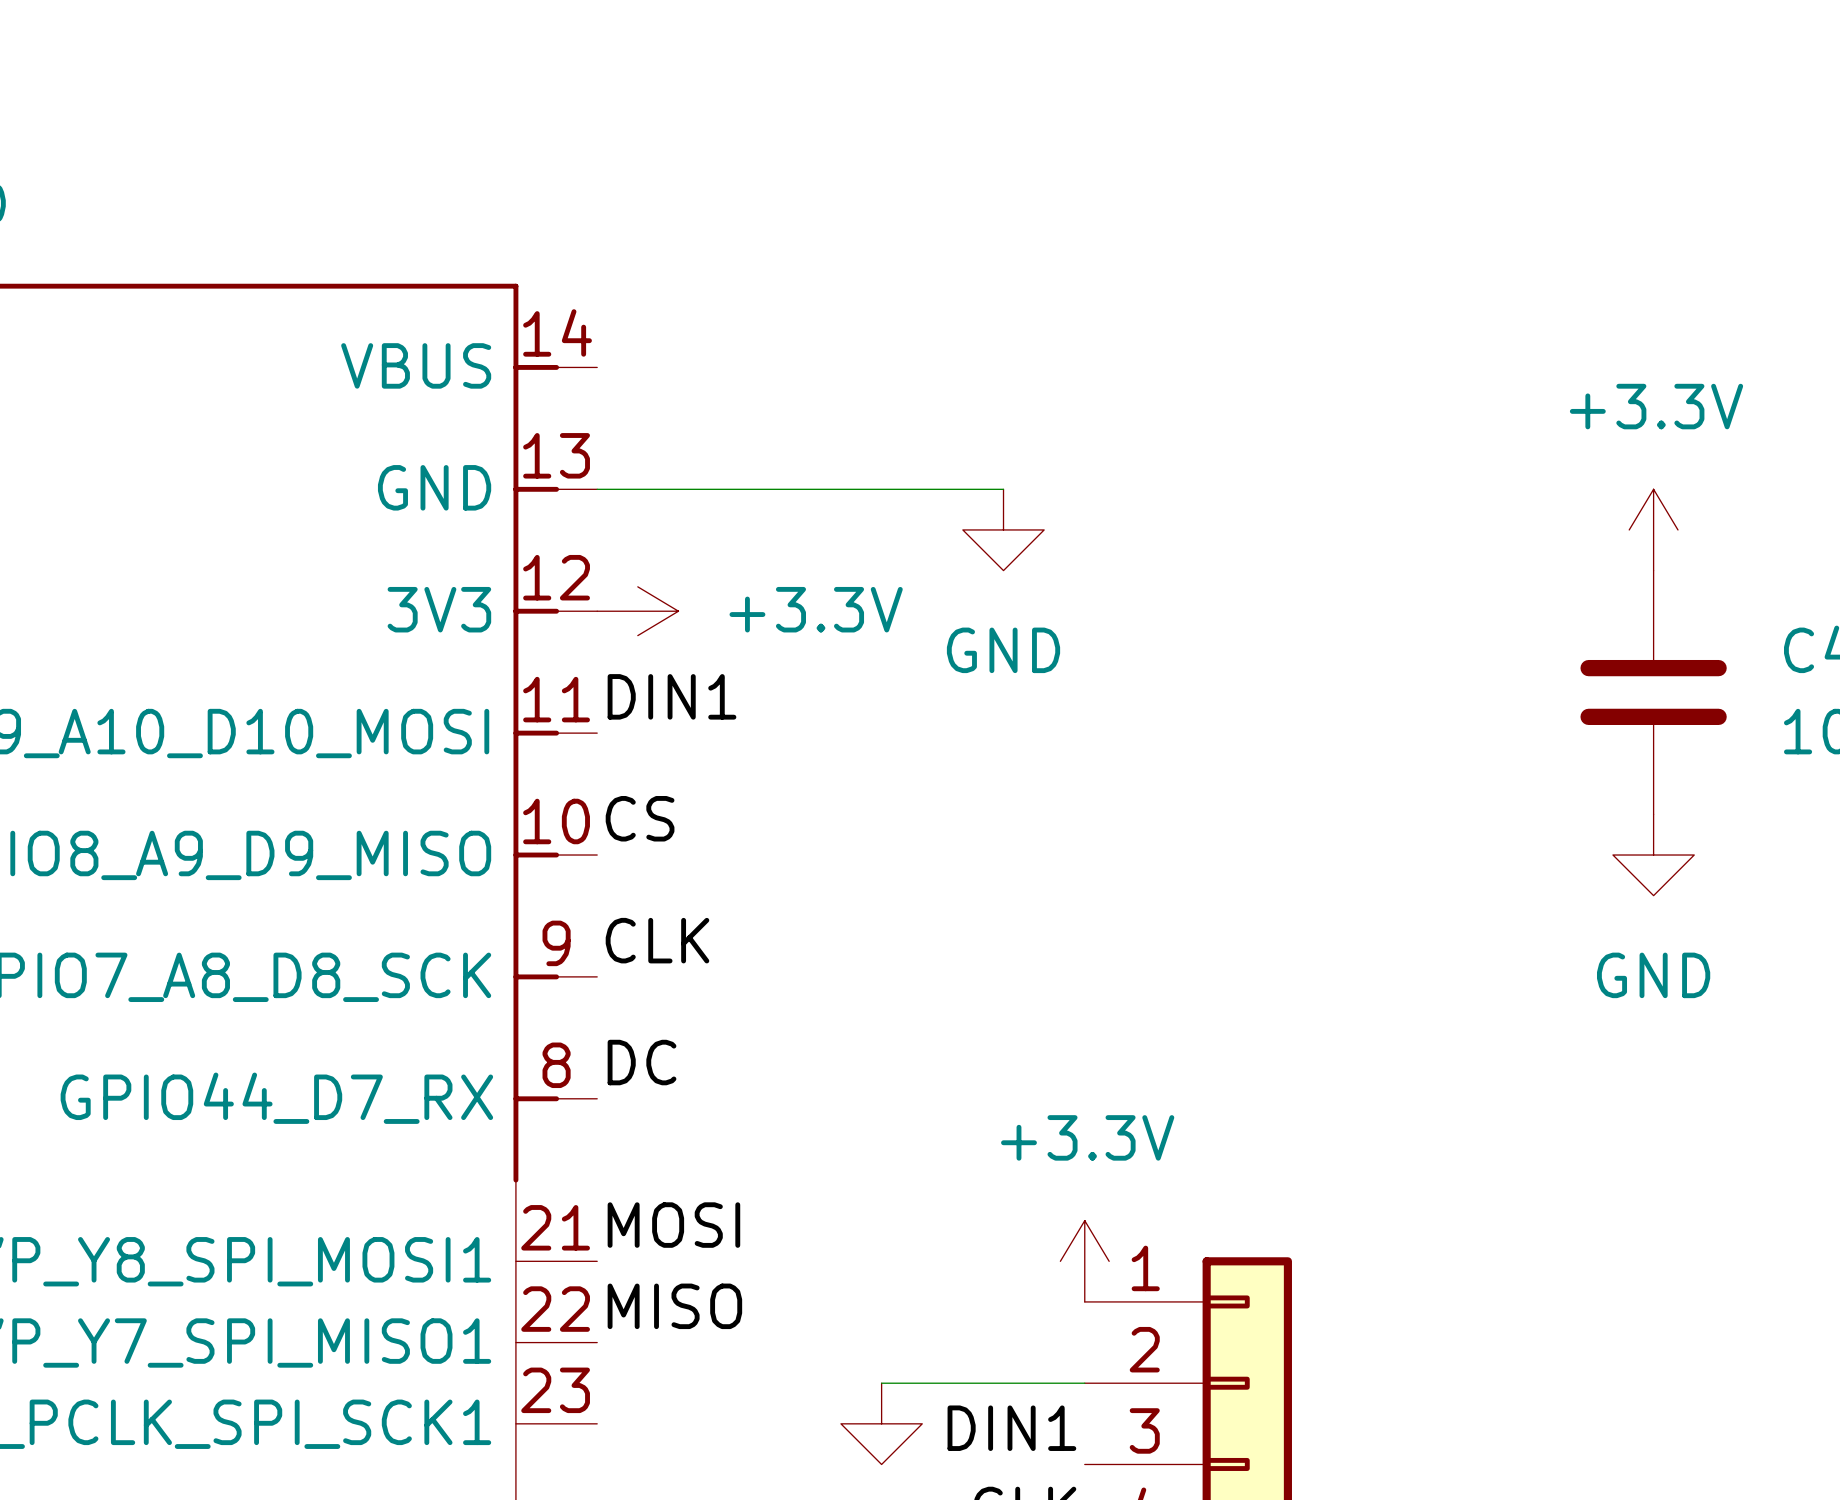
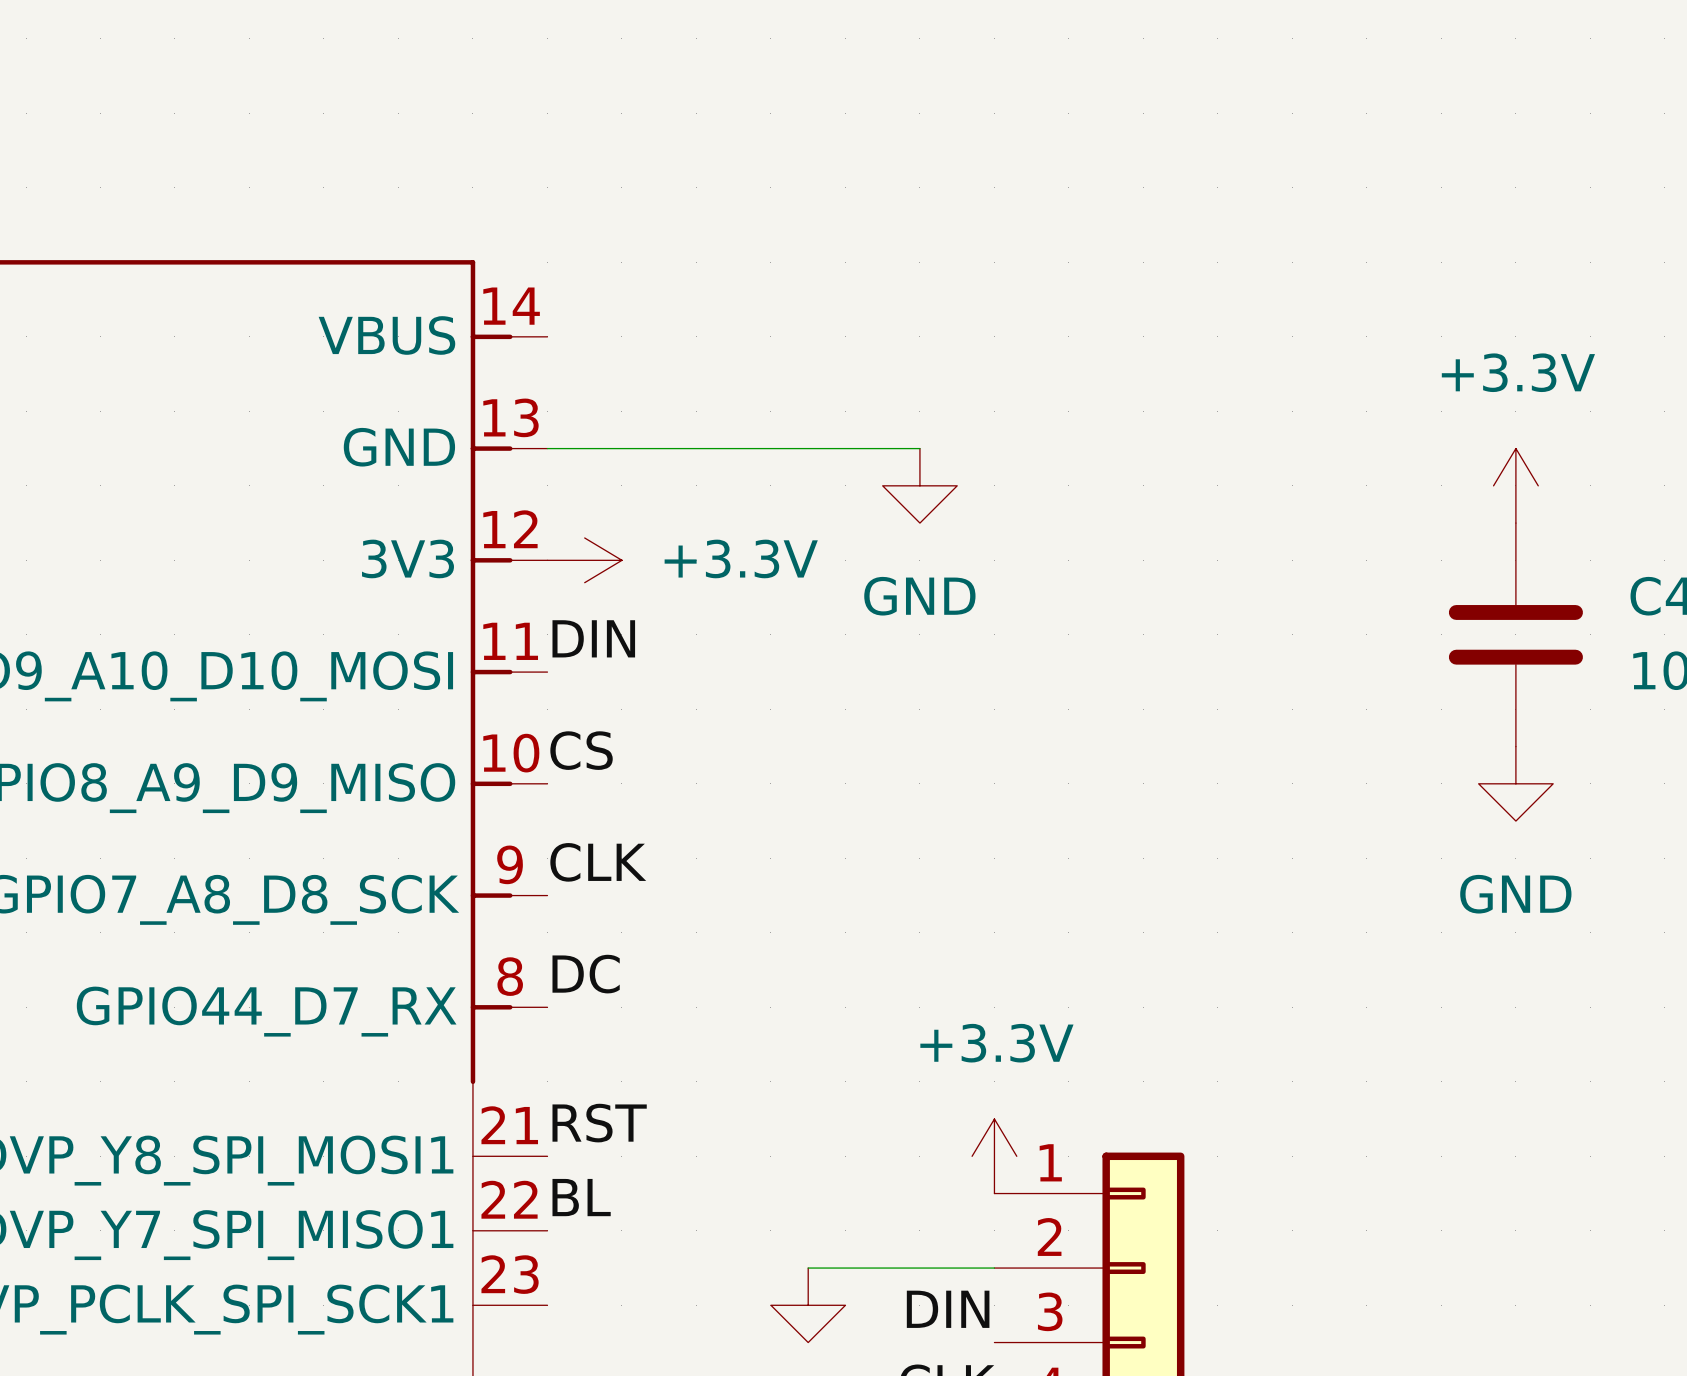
label: DIN1 (671, 696) -> DIN (593, 638)
label: MOSI (673, 1225) -> RST (599, 1123)
label: MISO (674, 1306) -> BL (581, 1197)
label: DIN1 (1011, 1428) -> DIN (948, 1309)

